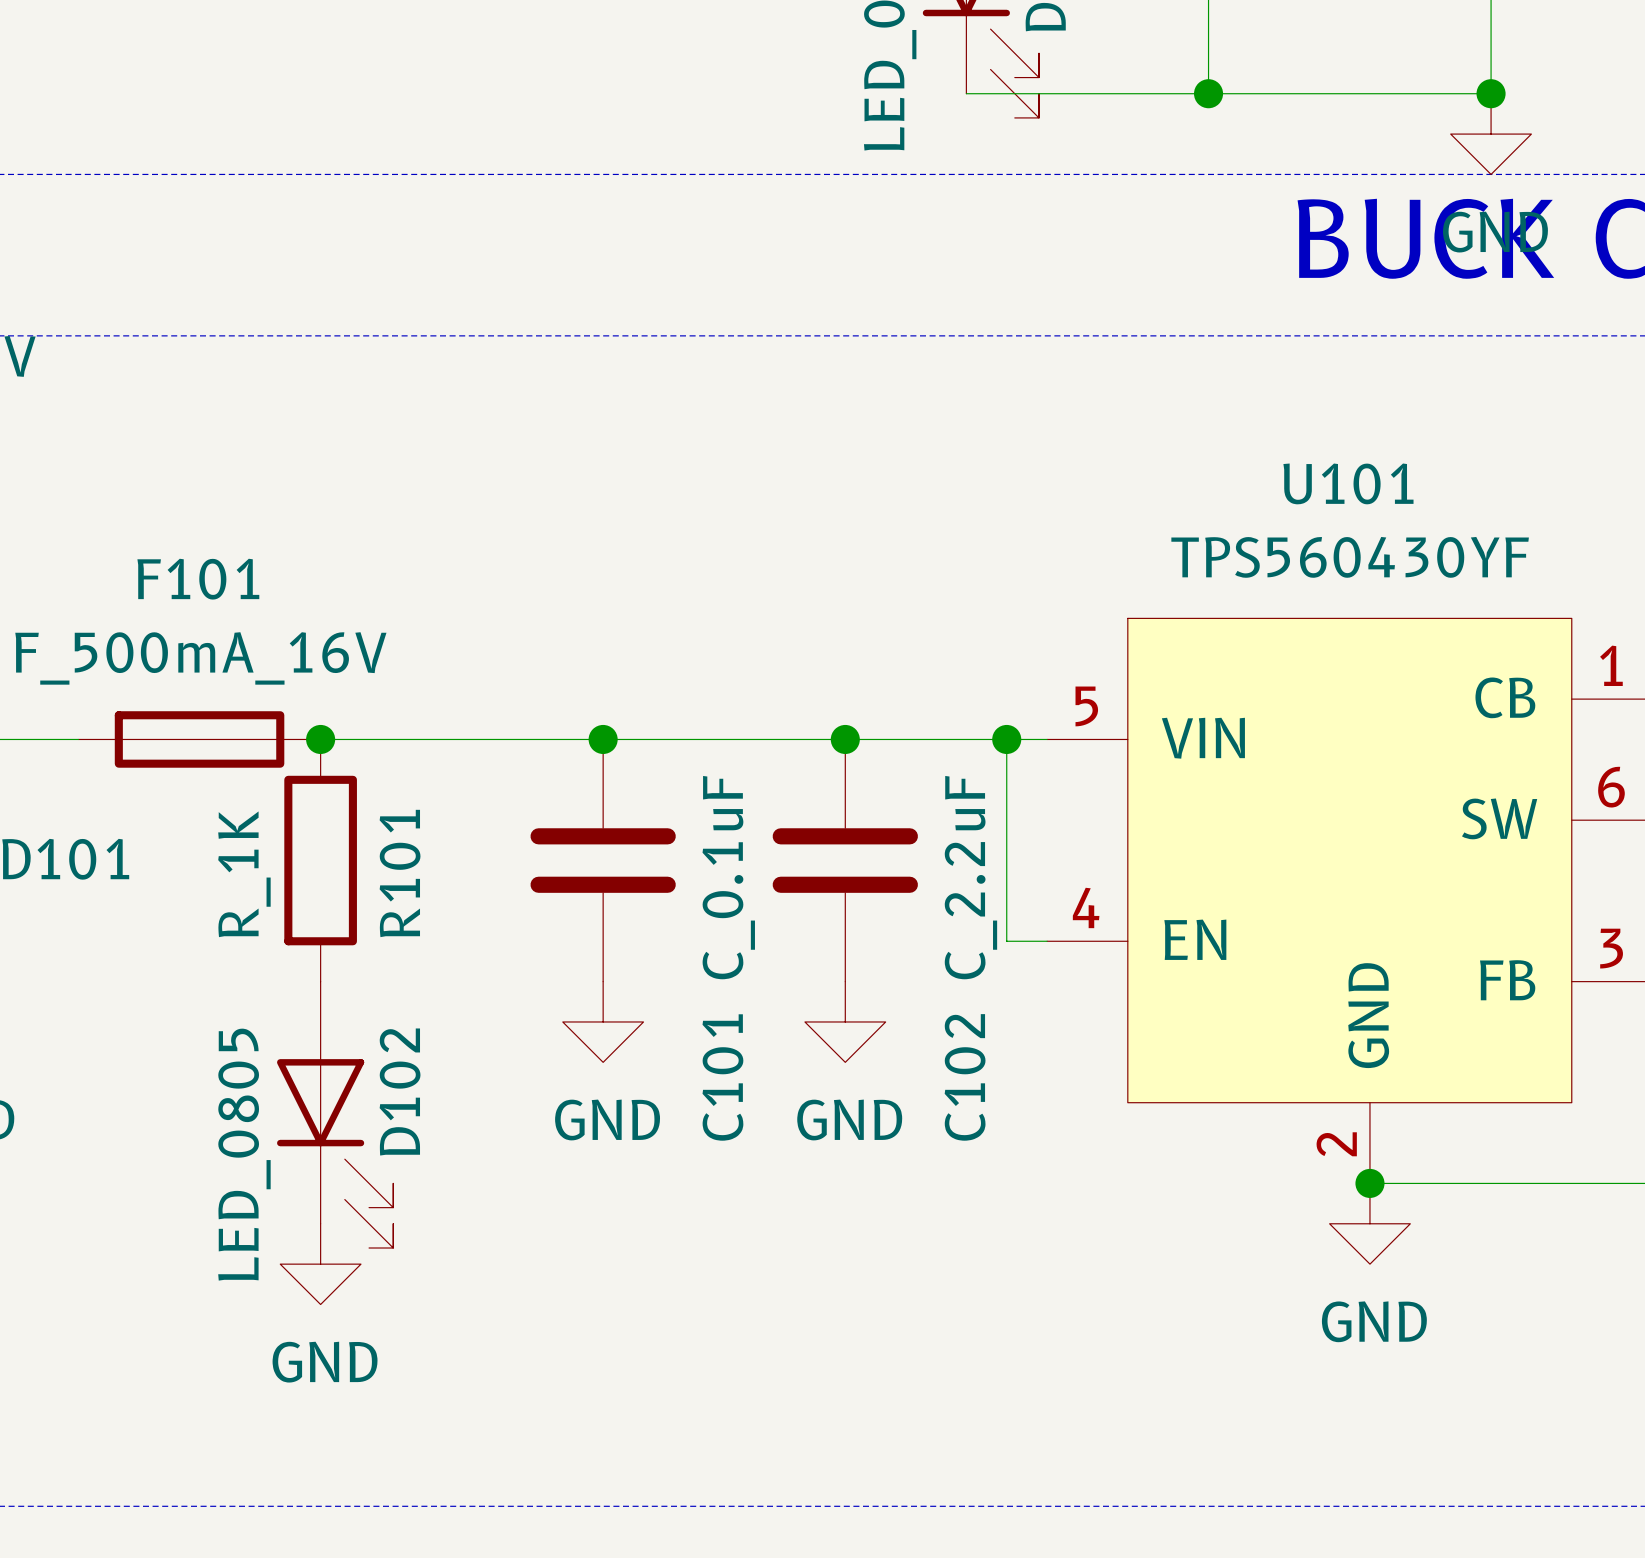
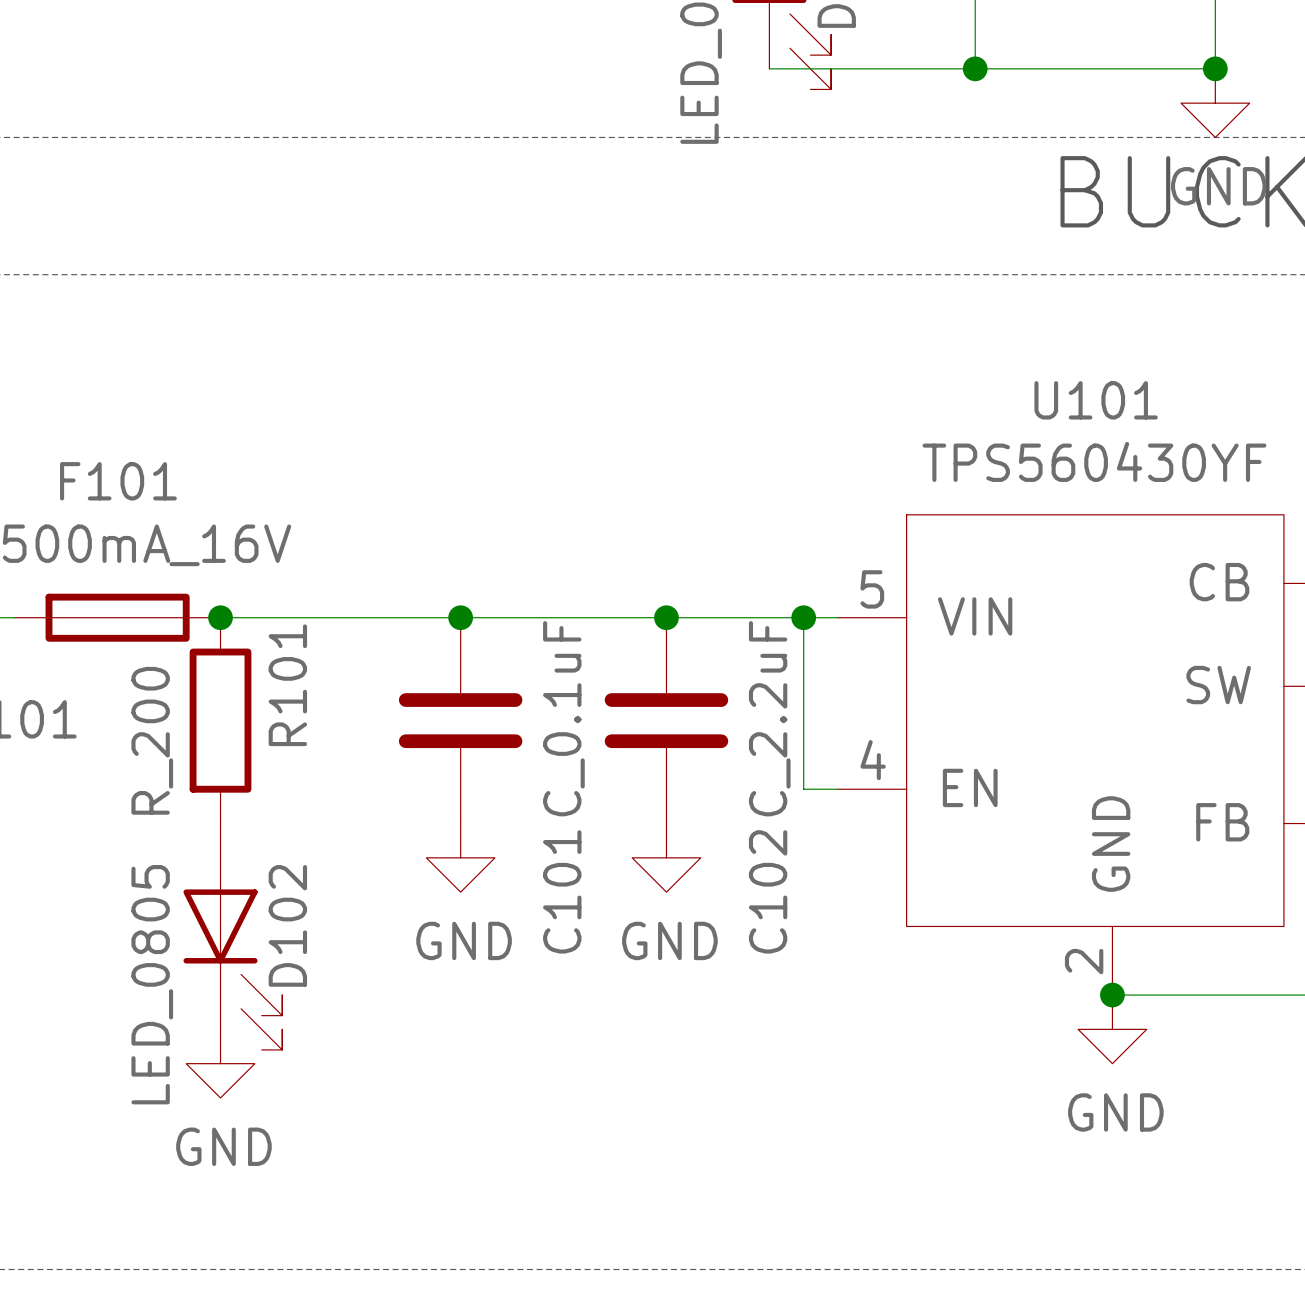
R101 name position: R101 (400, 873) -> R101 (287, 685)
R101 value: R_1K (244, 874) -> R_200 (152, 740)

